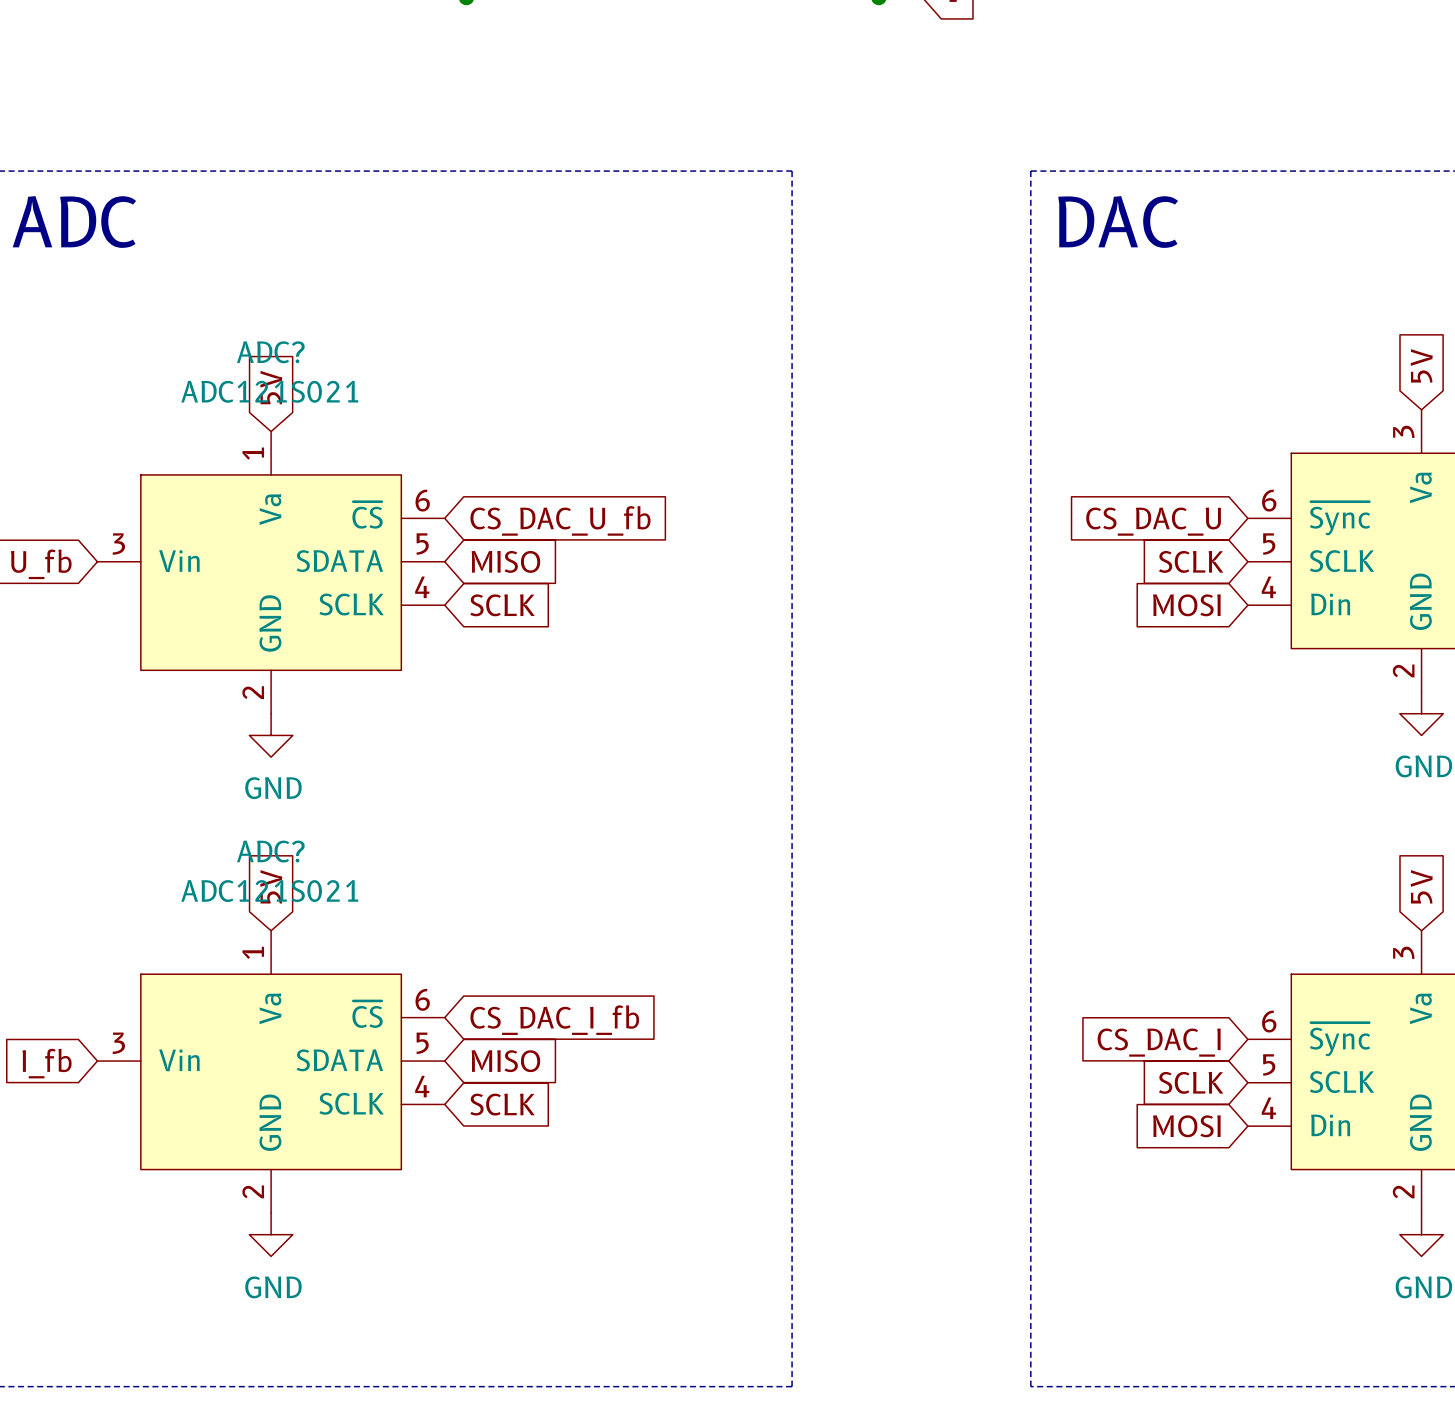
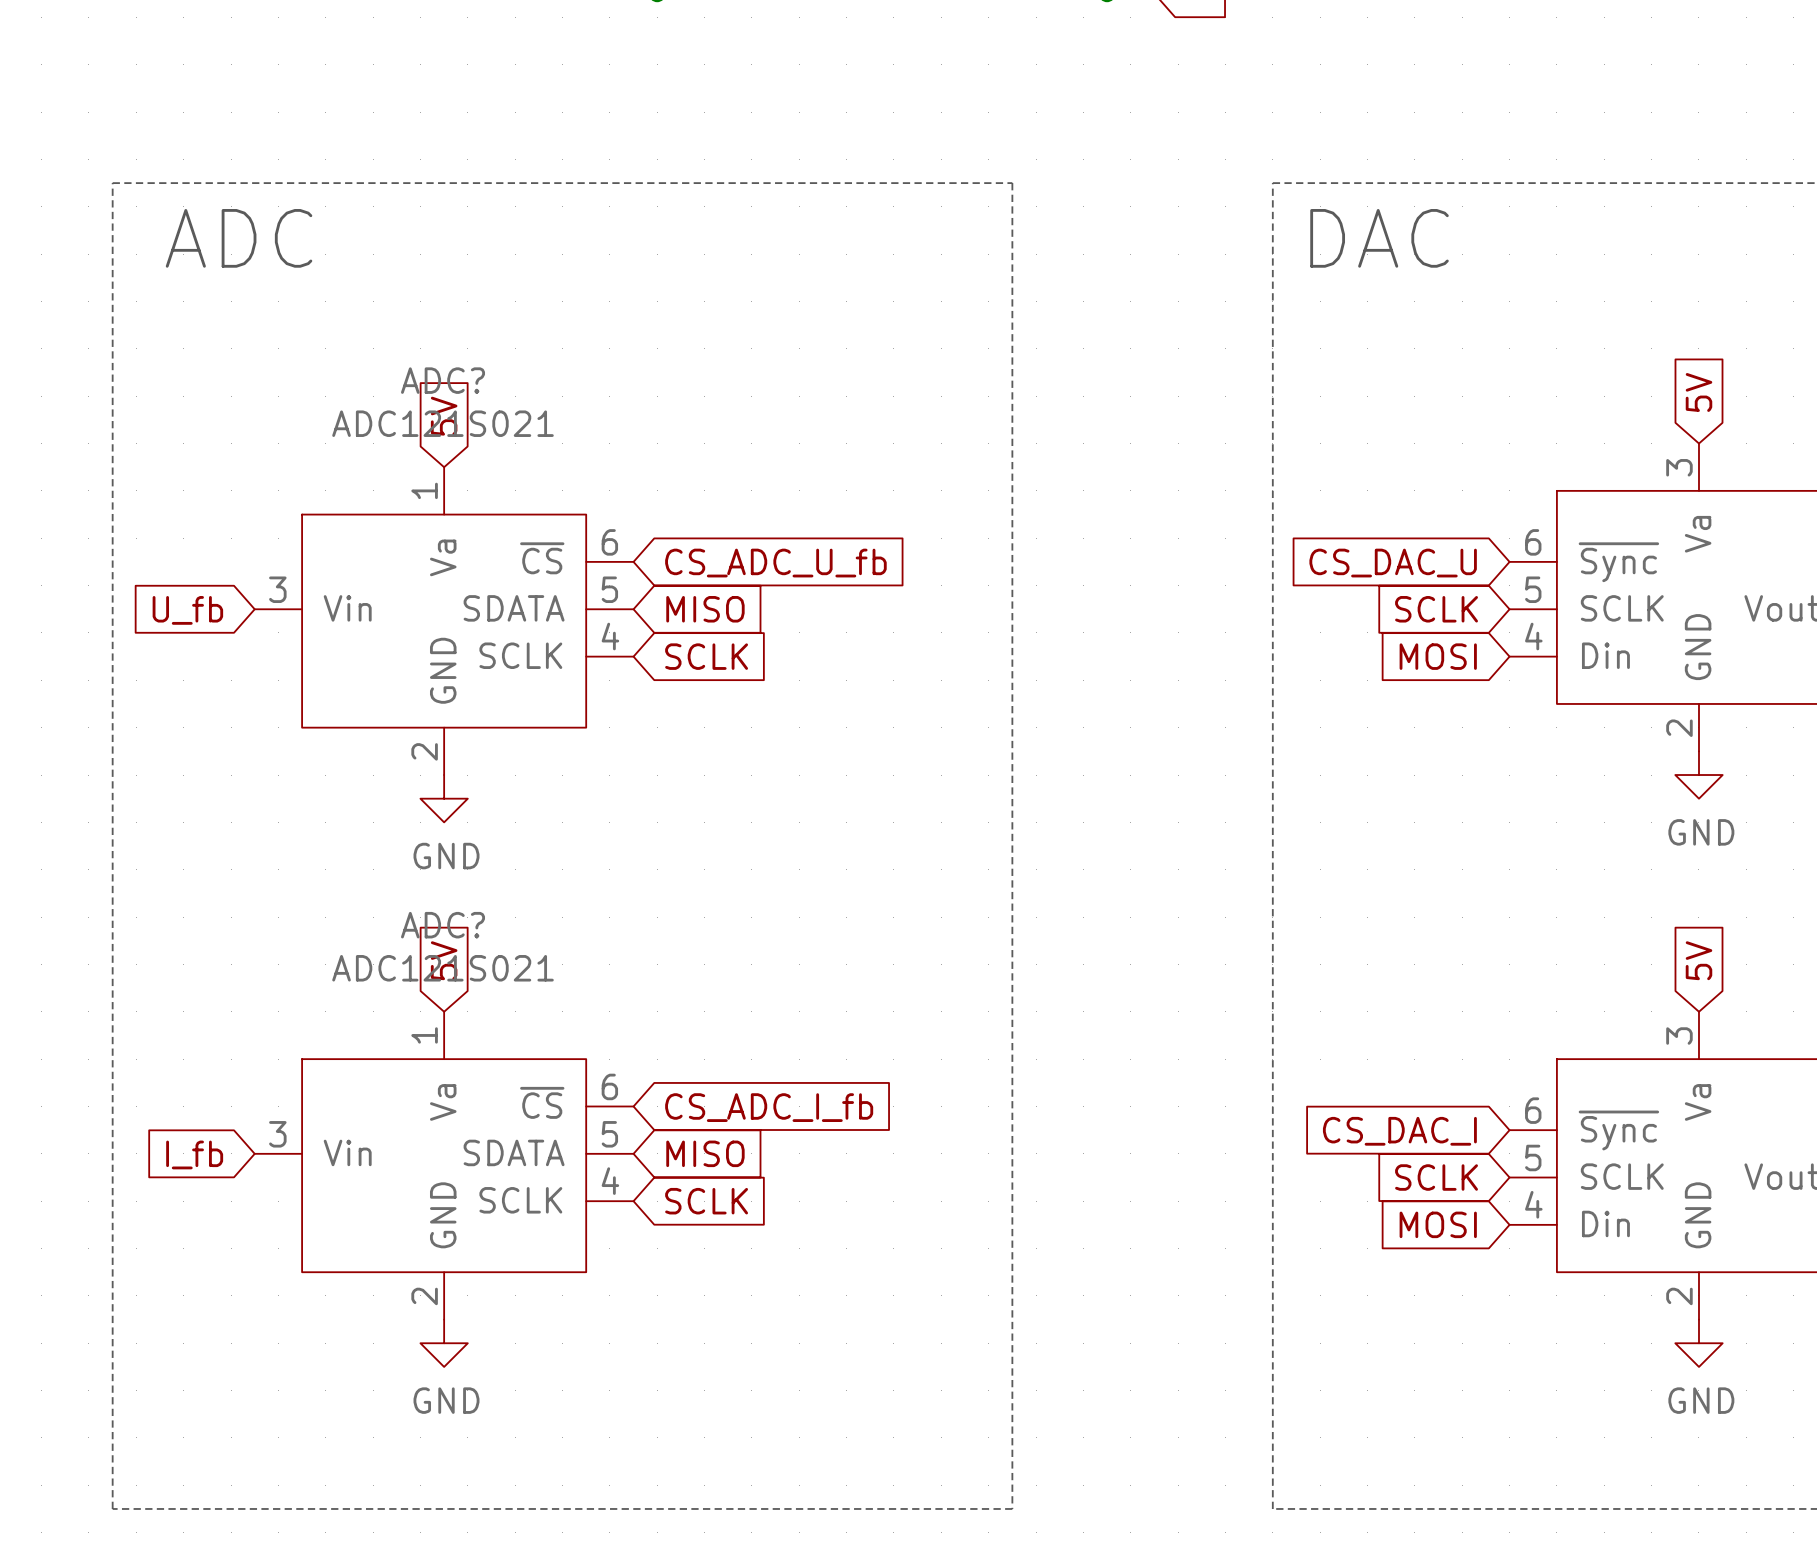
global label: CS_DAC_U_fb (560, 520) -> CS_ADC_U_fb (775, 563)
global label: CS_DAC_I_fb (554, 1020) -> CS_ADC_I_fb (769, 1107)

